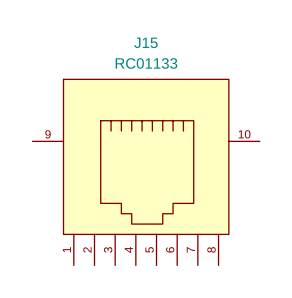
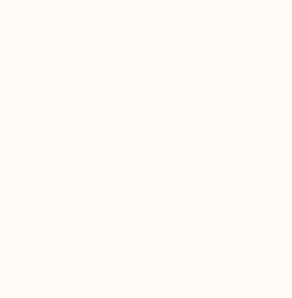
J15: RC01133 (146, 172) -> none

